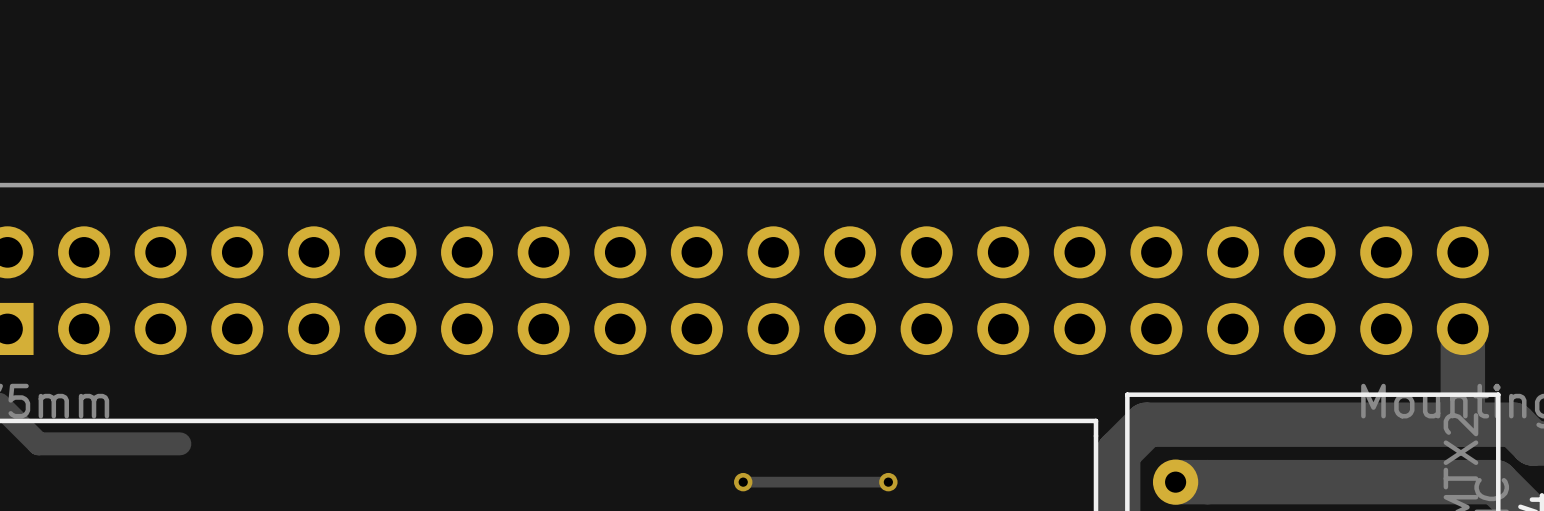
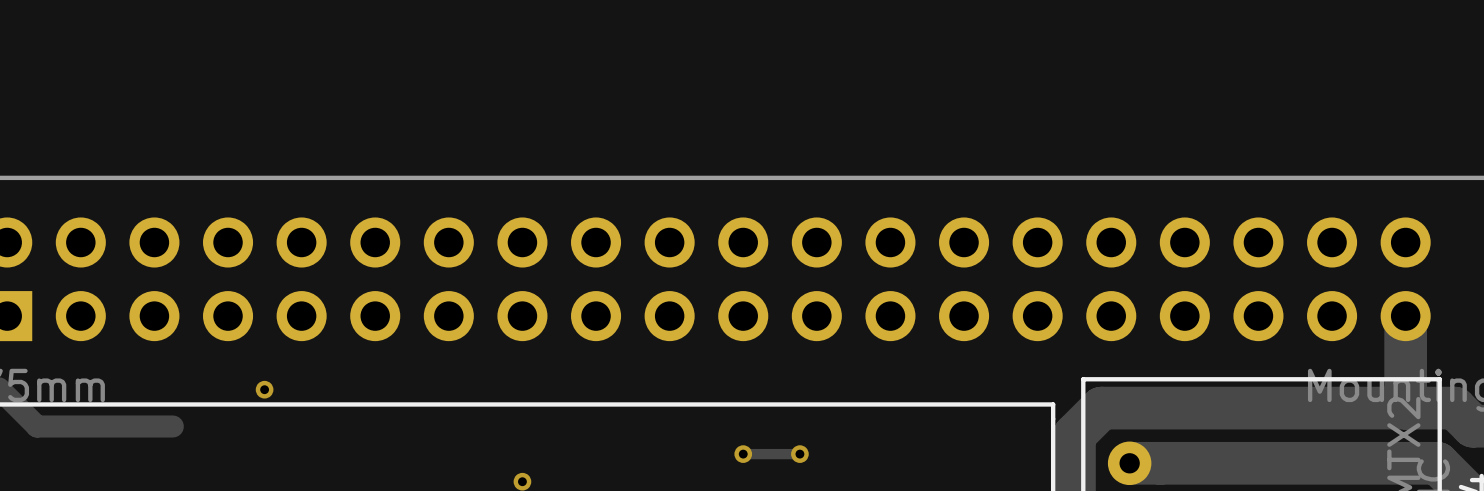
via: none -> (264, 389)
track: none -> (743, 454) (799, 454)
via: none -> (799, 454)
track: (743, 482) (888, 482) -> none
via position: (743, 482) -> (743, 454)
via: (888, 482) -> none
via: none -> (522, 481)

